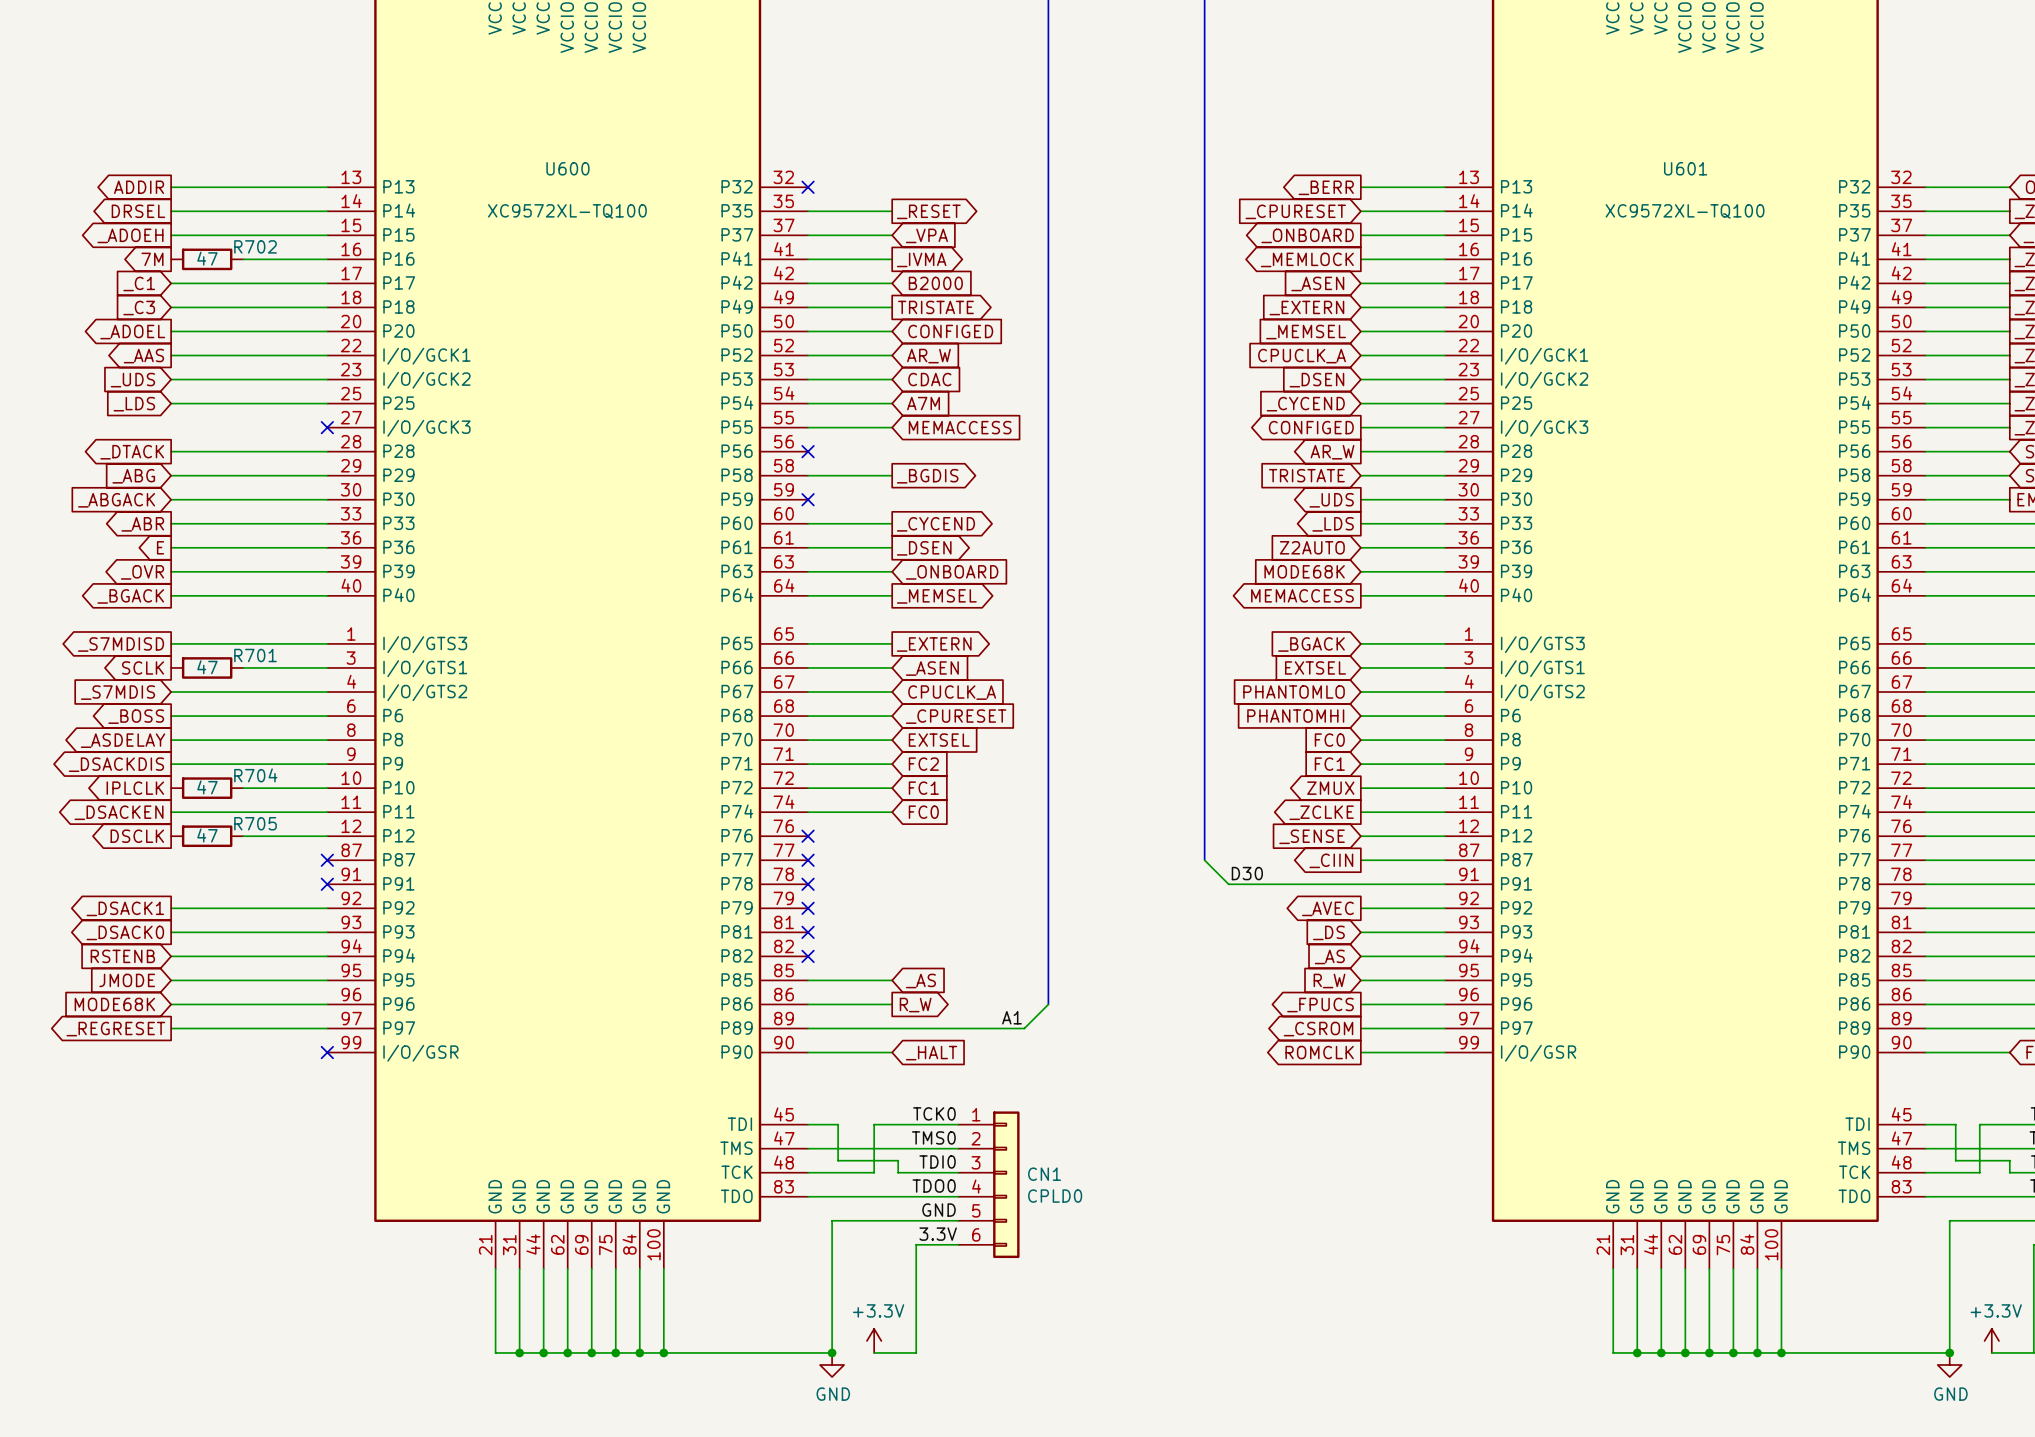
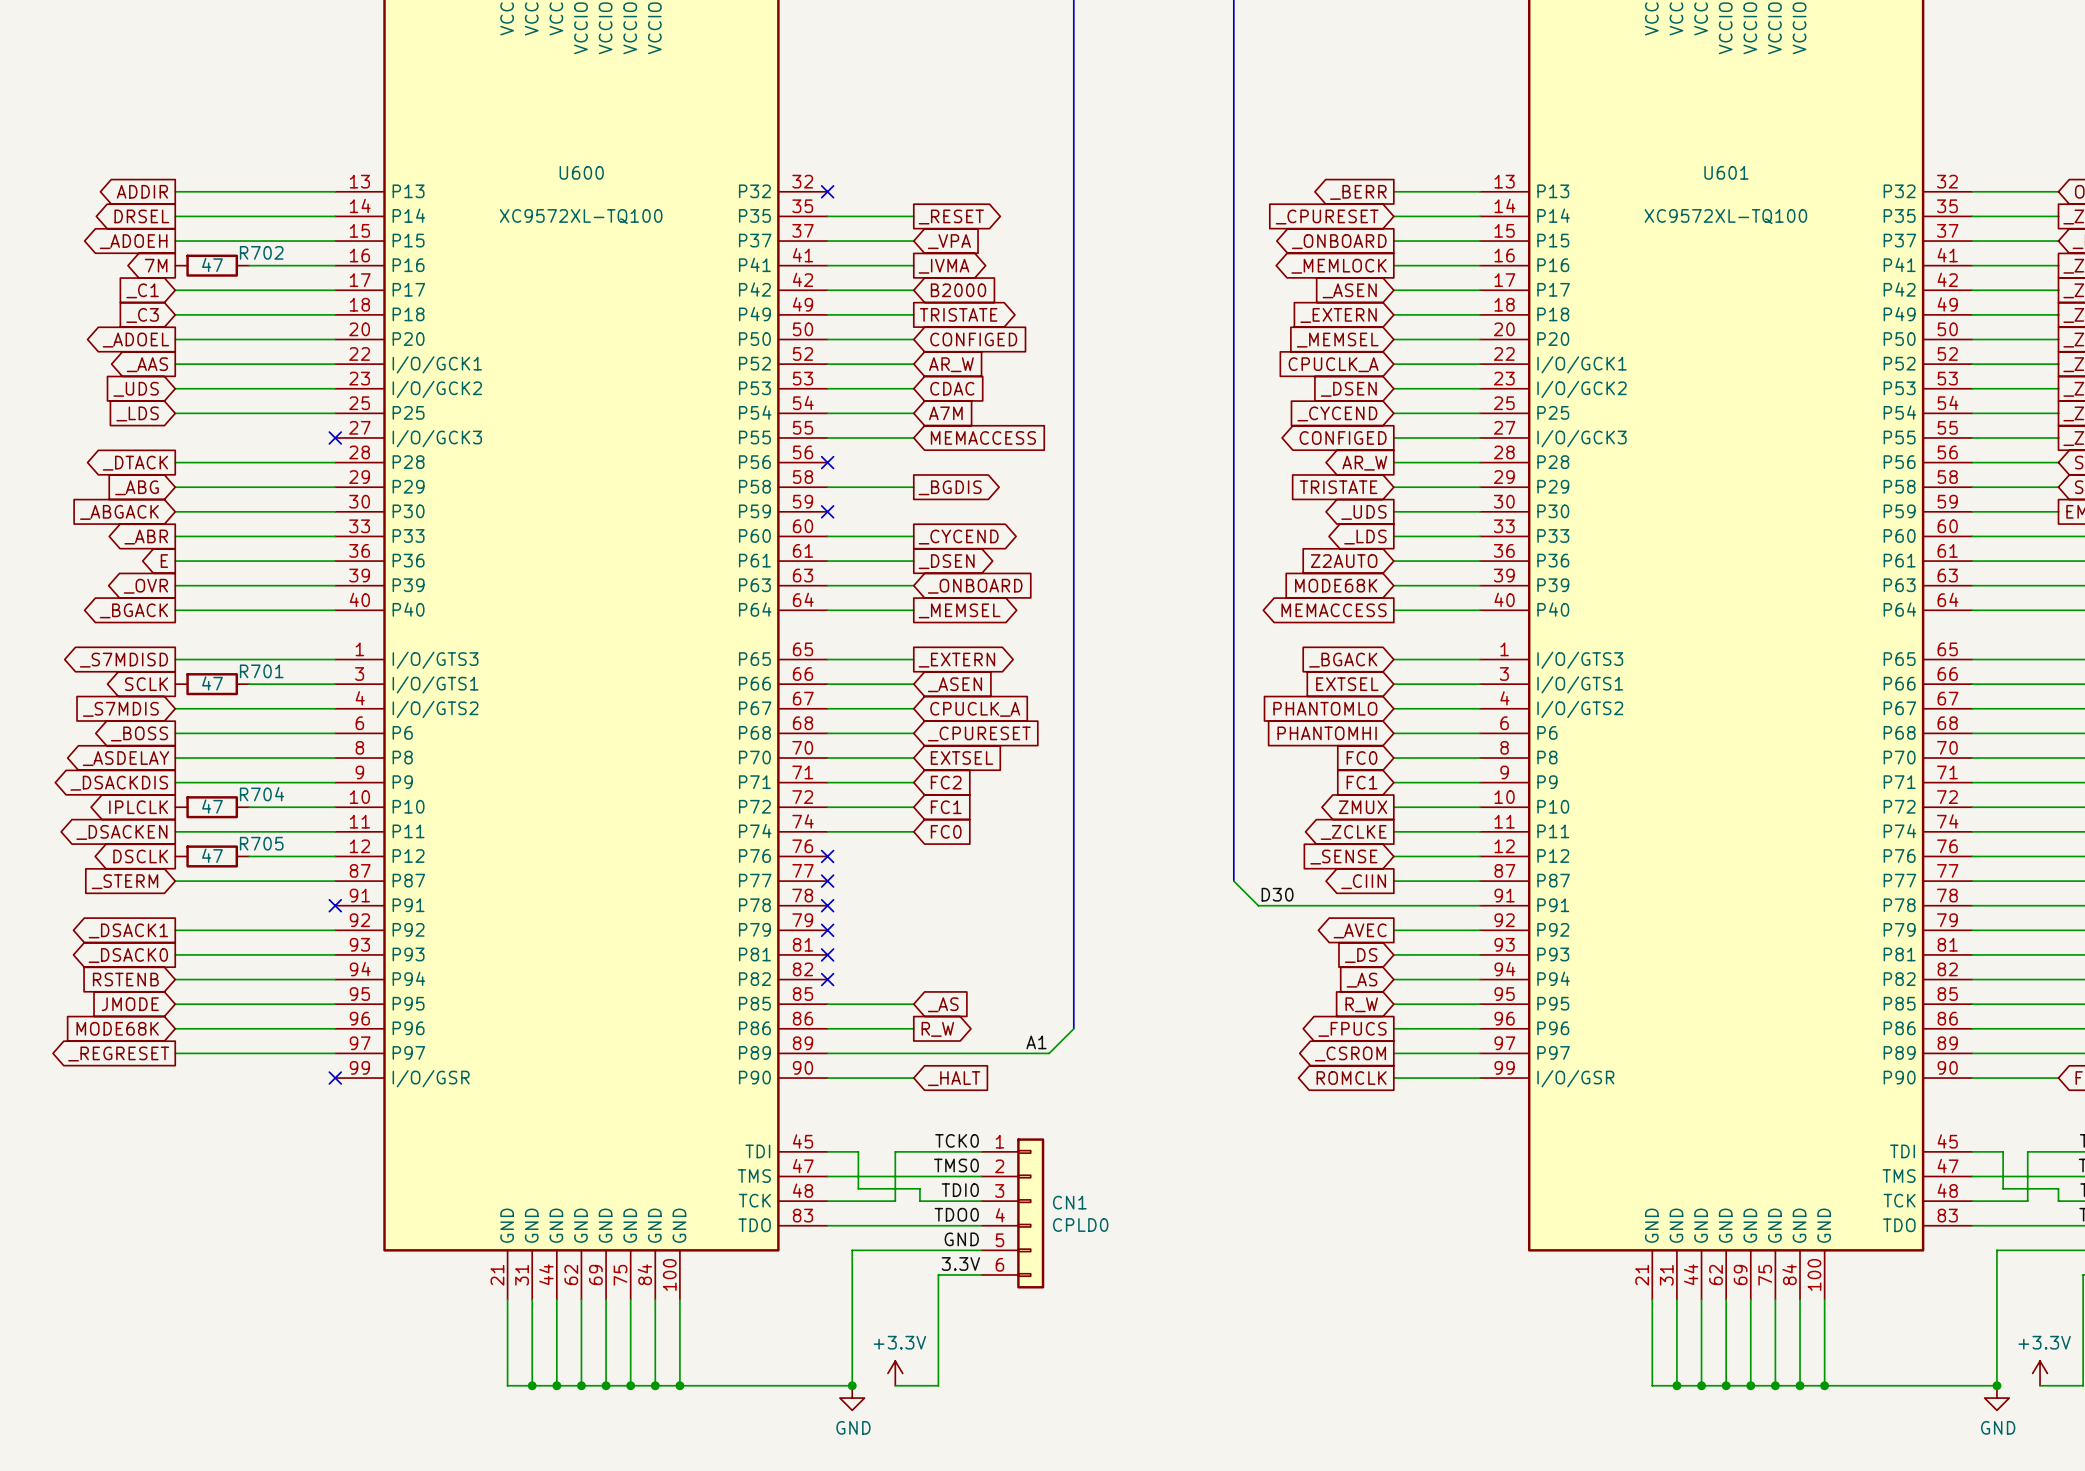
global label: none -> _STERM (124, 881)
wire: none -> (175, 881) (335, 881)
no-connect mark: (327, 860) -> none

